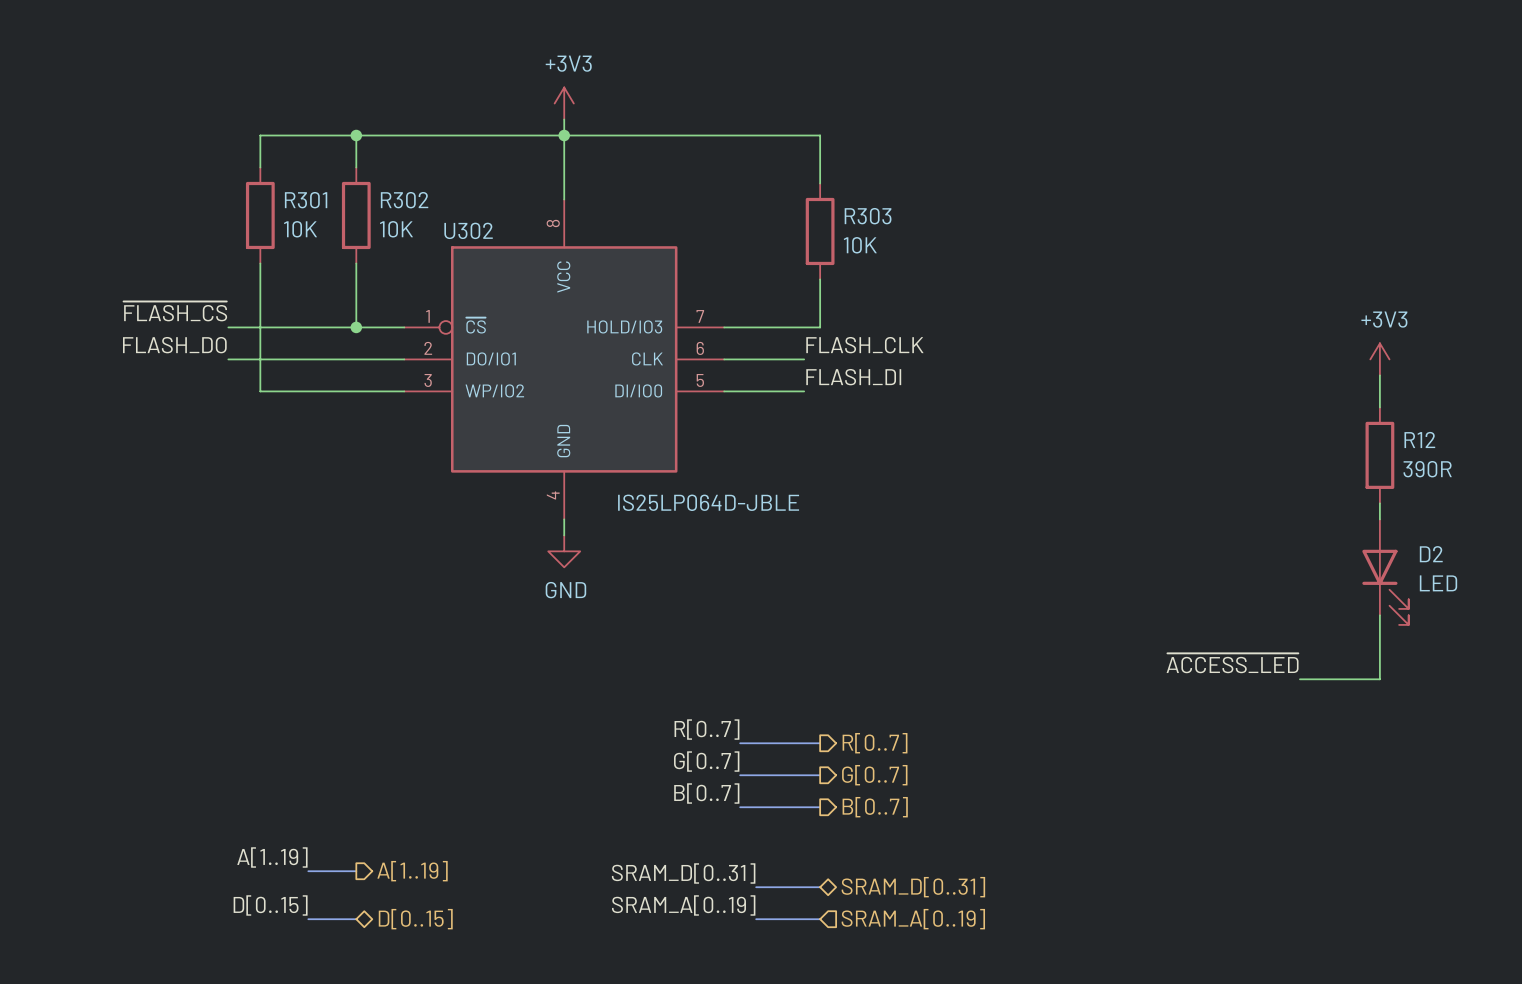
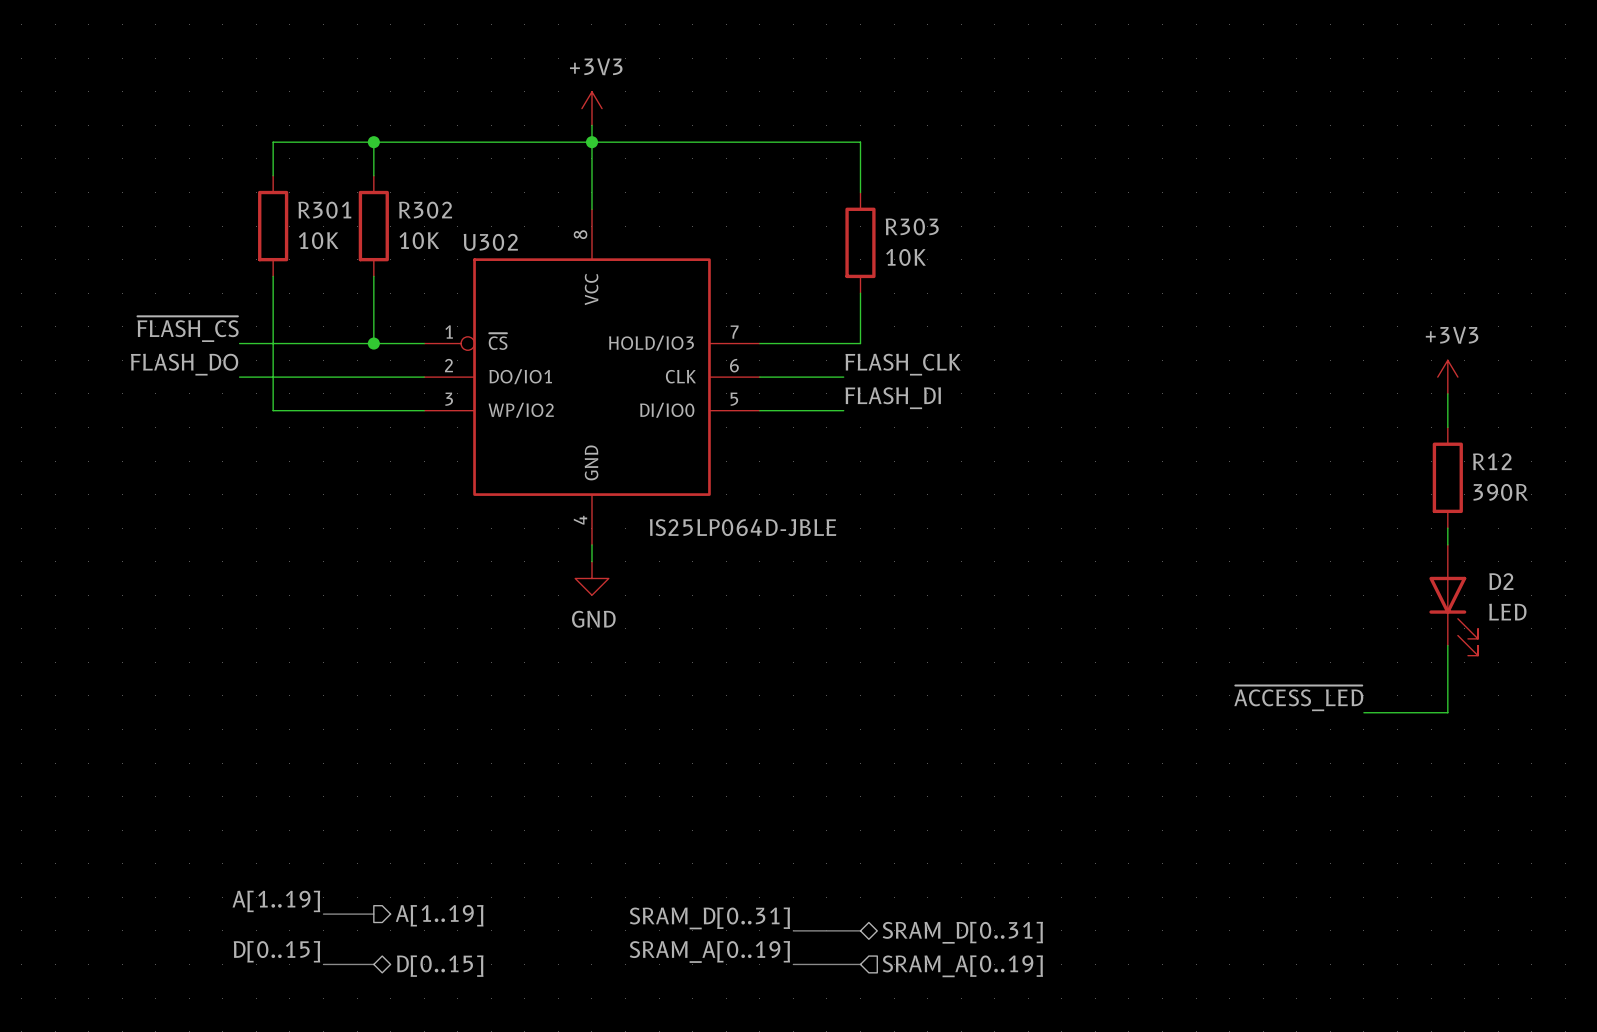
label: R[0..7] (706, 729) -> none
bus: (740, 743) (820, 743) -> none
hierarchical label: R[0..7] (875, 743) -> none
label: G[0..7] (706, 761) -> none
bus: (740, 775) (820, 775) -> none
hierarchical label: G[0..7] (874, 775) -> none
label: B[0..7] (706, 793) -> none
bus: (740, 807) (820, 807) -> none
hierarchical label: B[0..7] (875, 807) -> none

